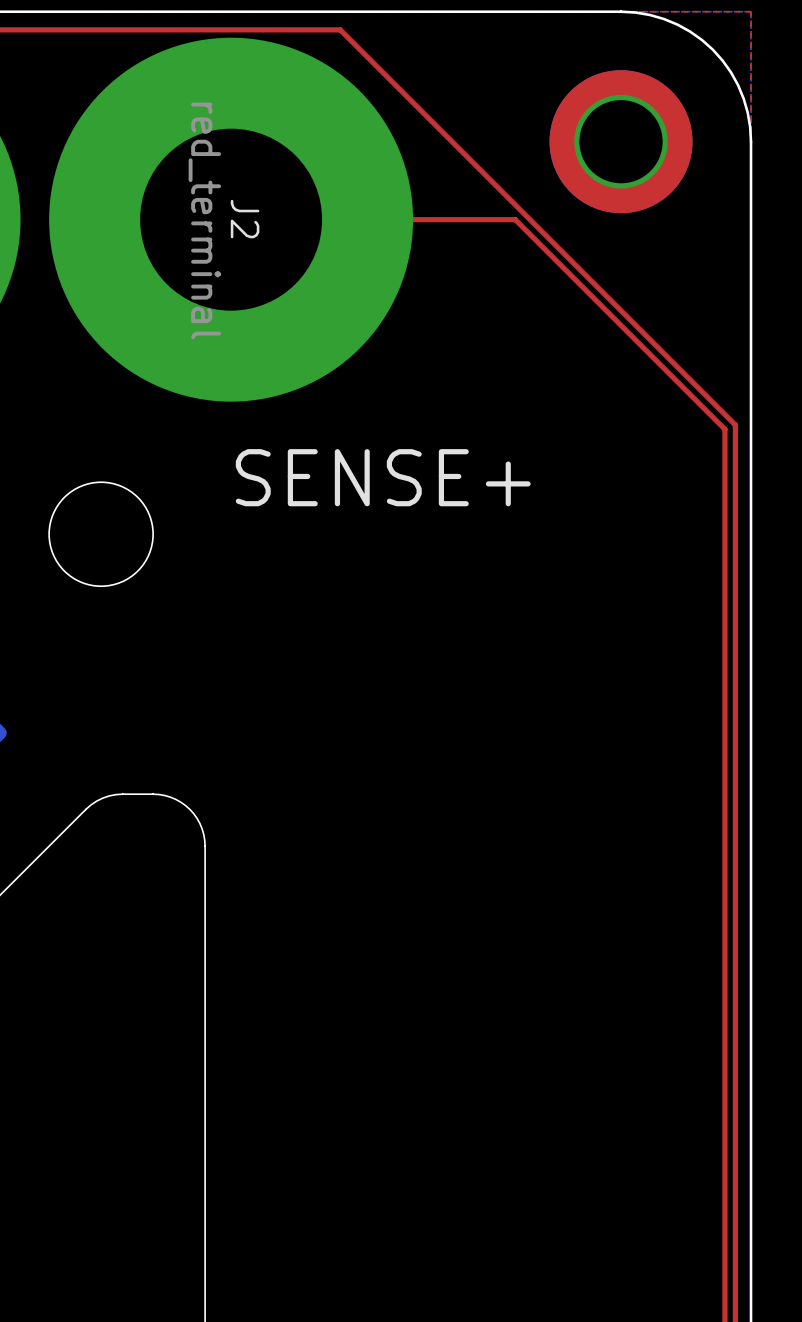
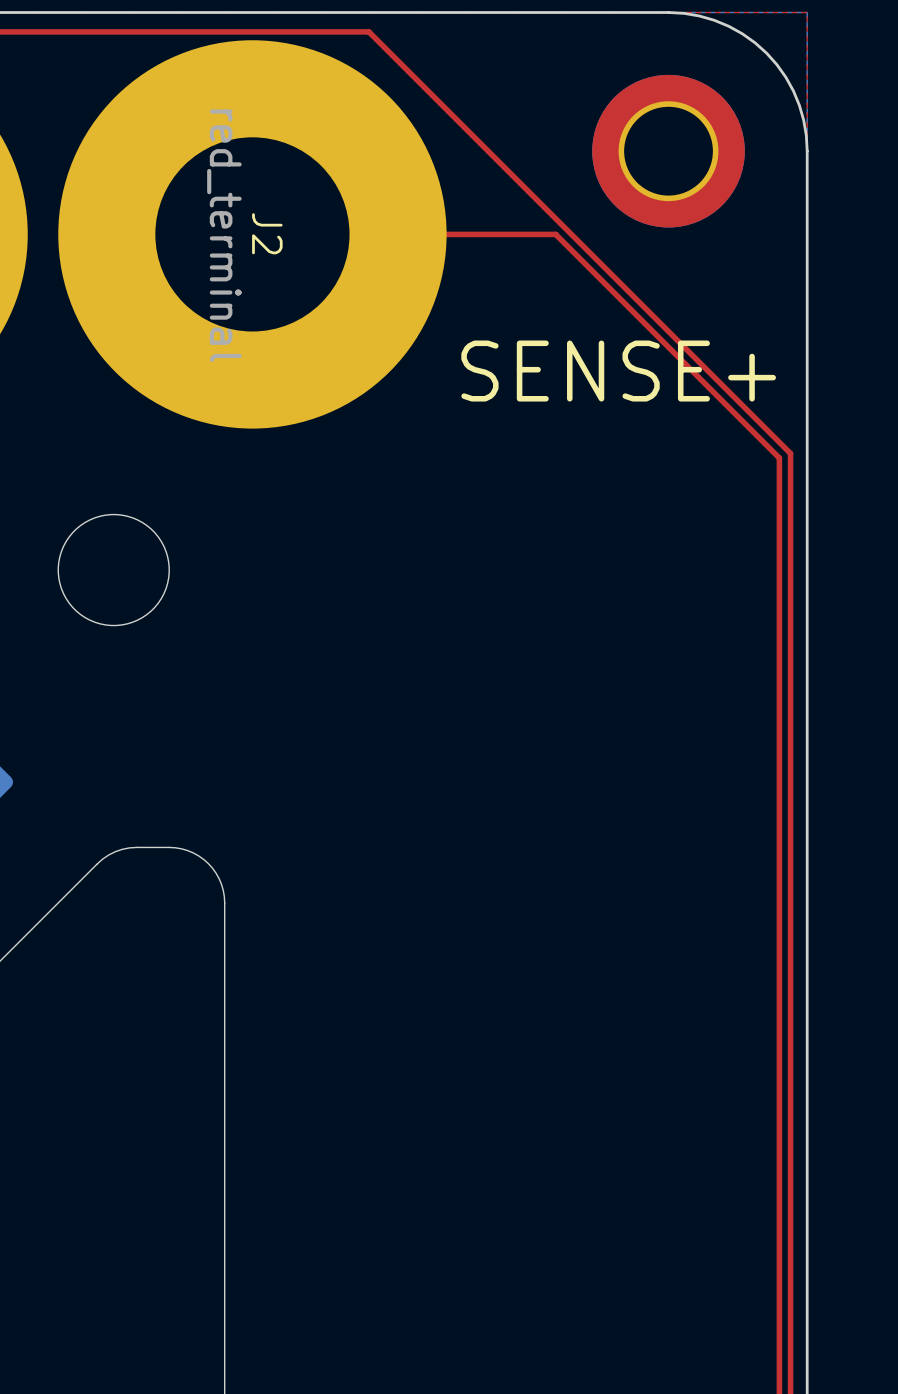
text position: SENSE+ (383, 477) -> SENSE+ (618, 371)

